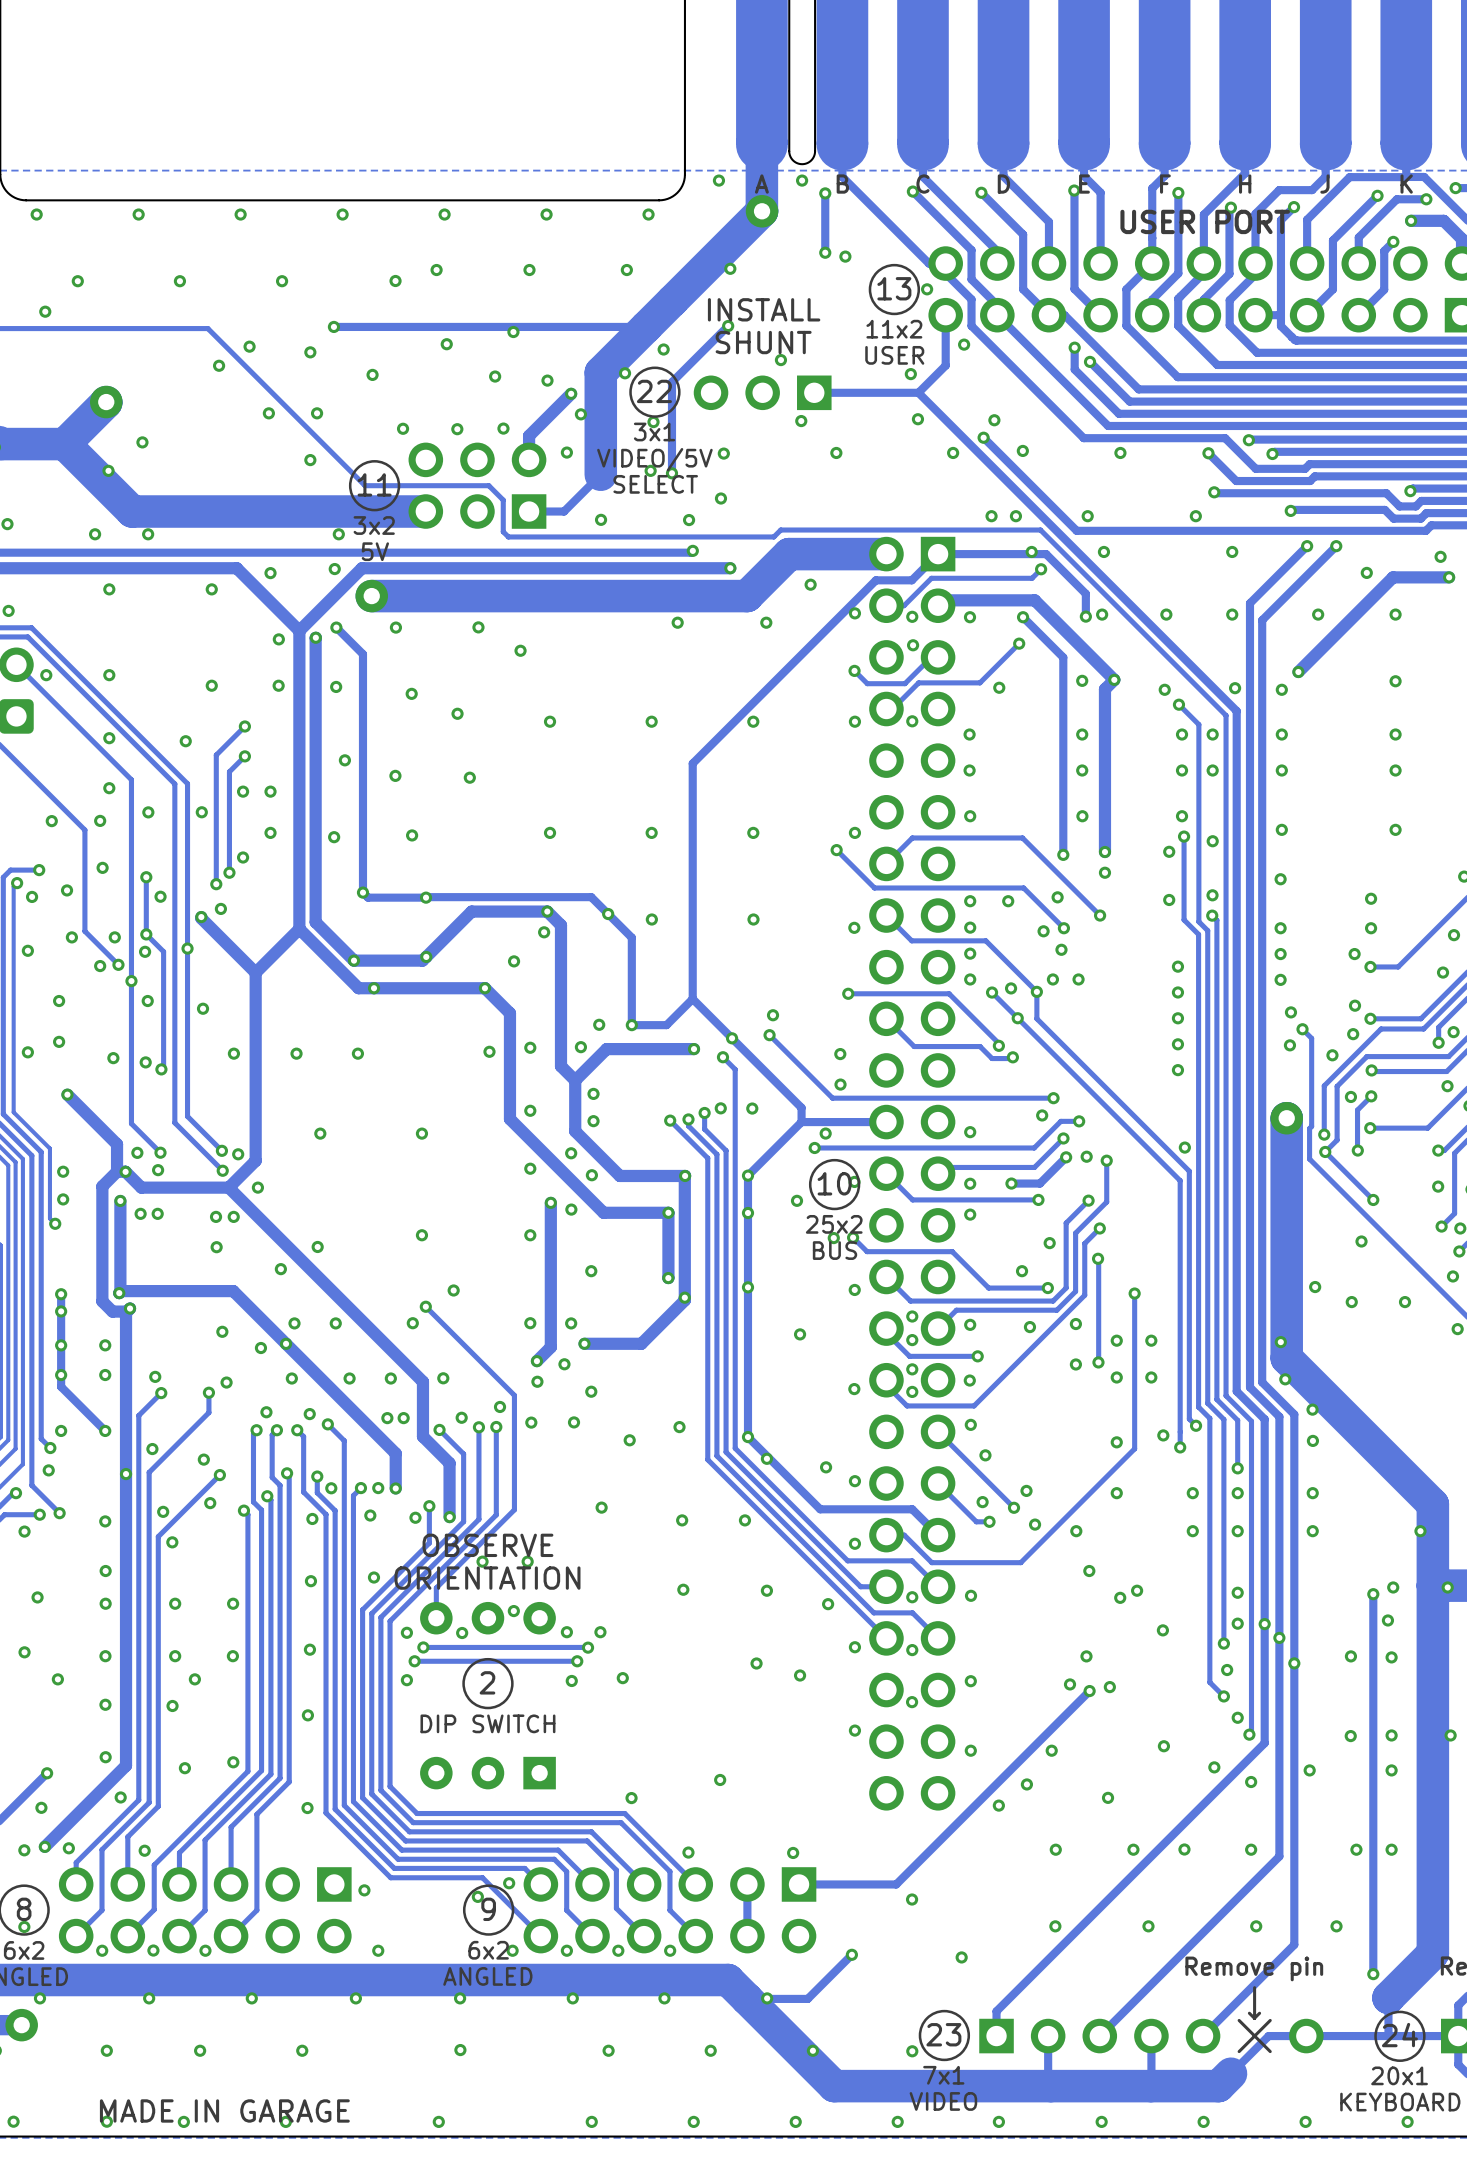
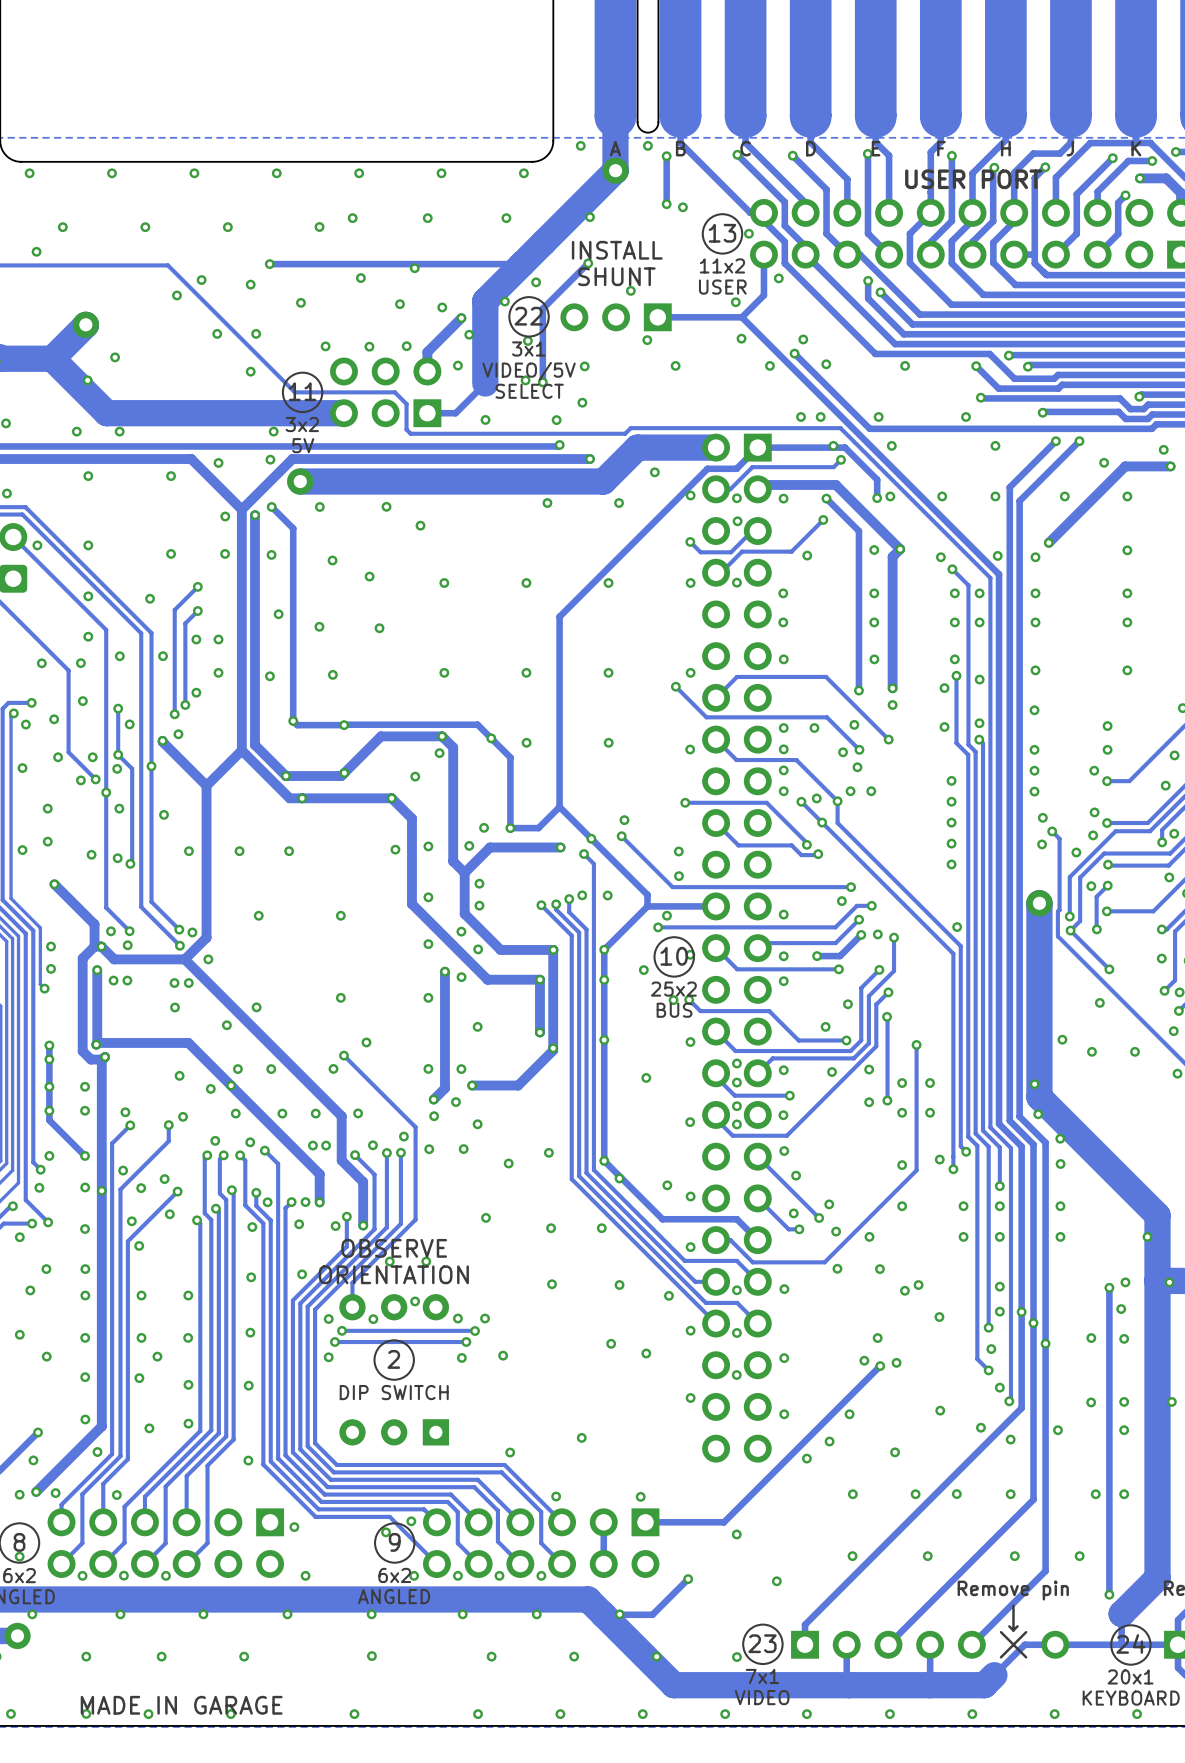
via: none -> (85, 1187)
via: none -> (141, 1188)
via: none -> (837, 1268)
via: none -> (46, 1269)
via: none -> (188, 1384)

